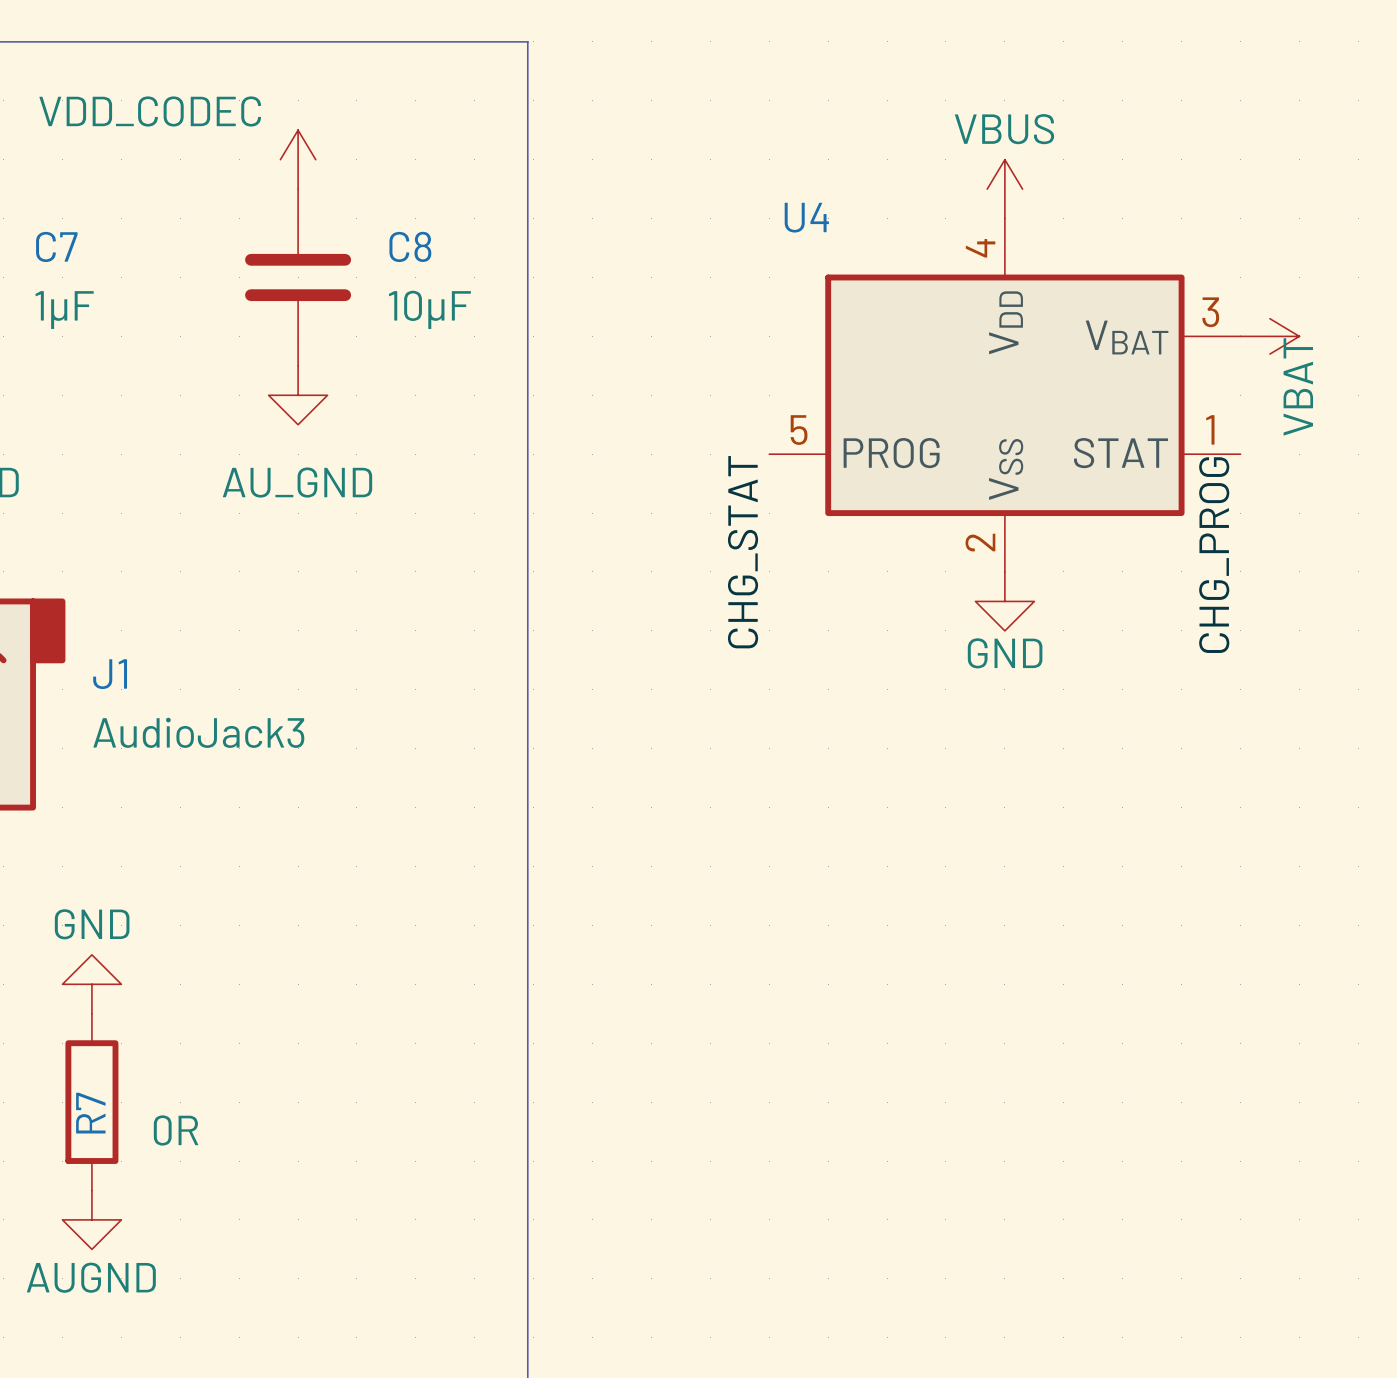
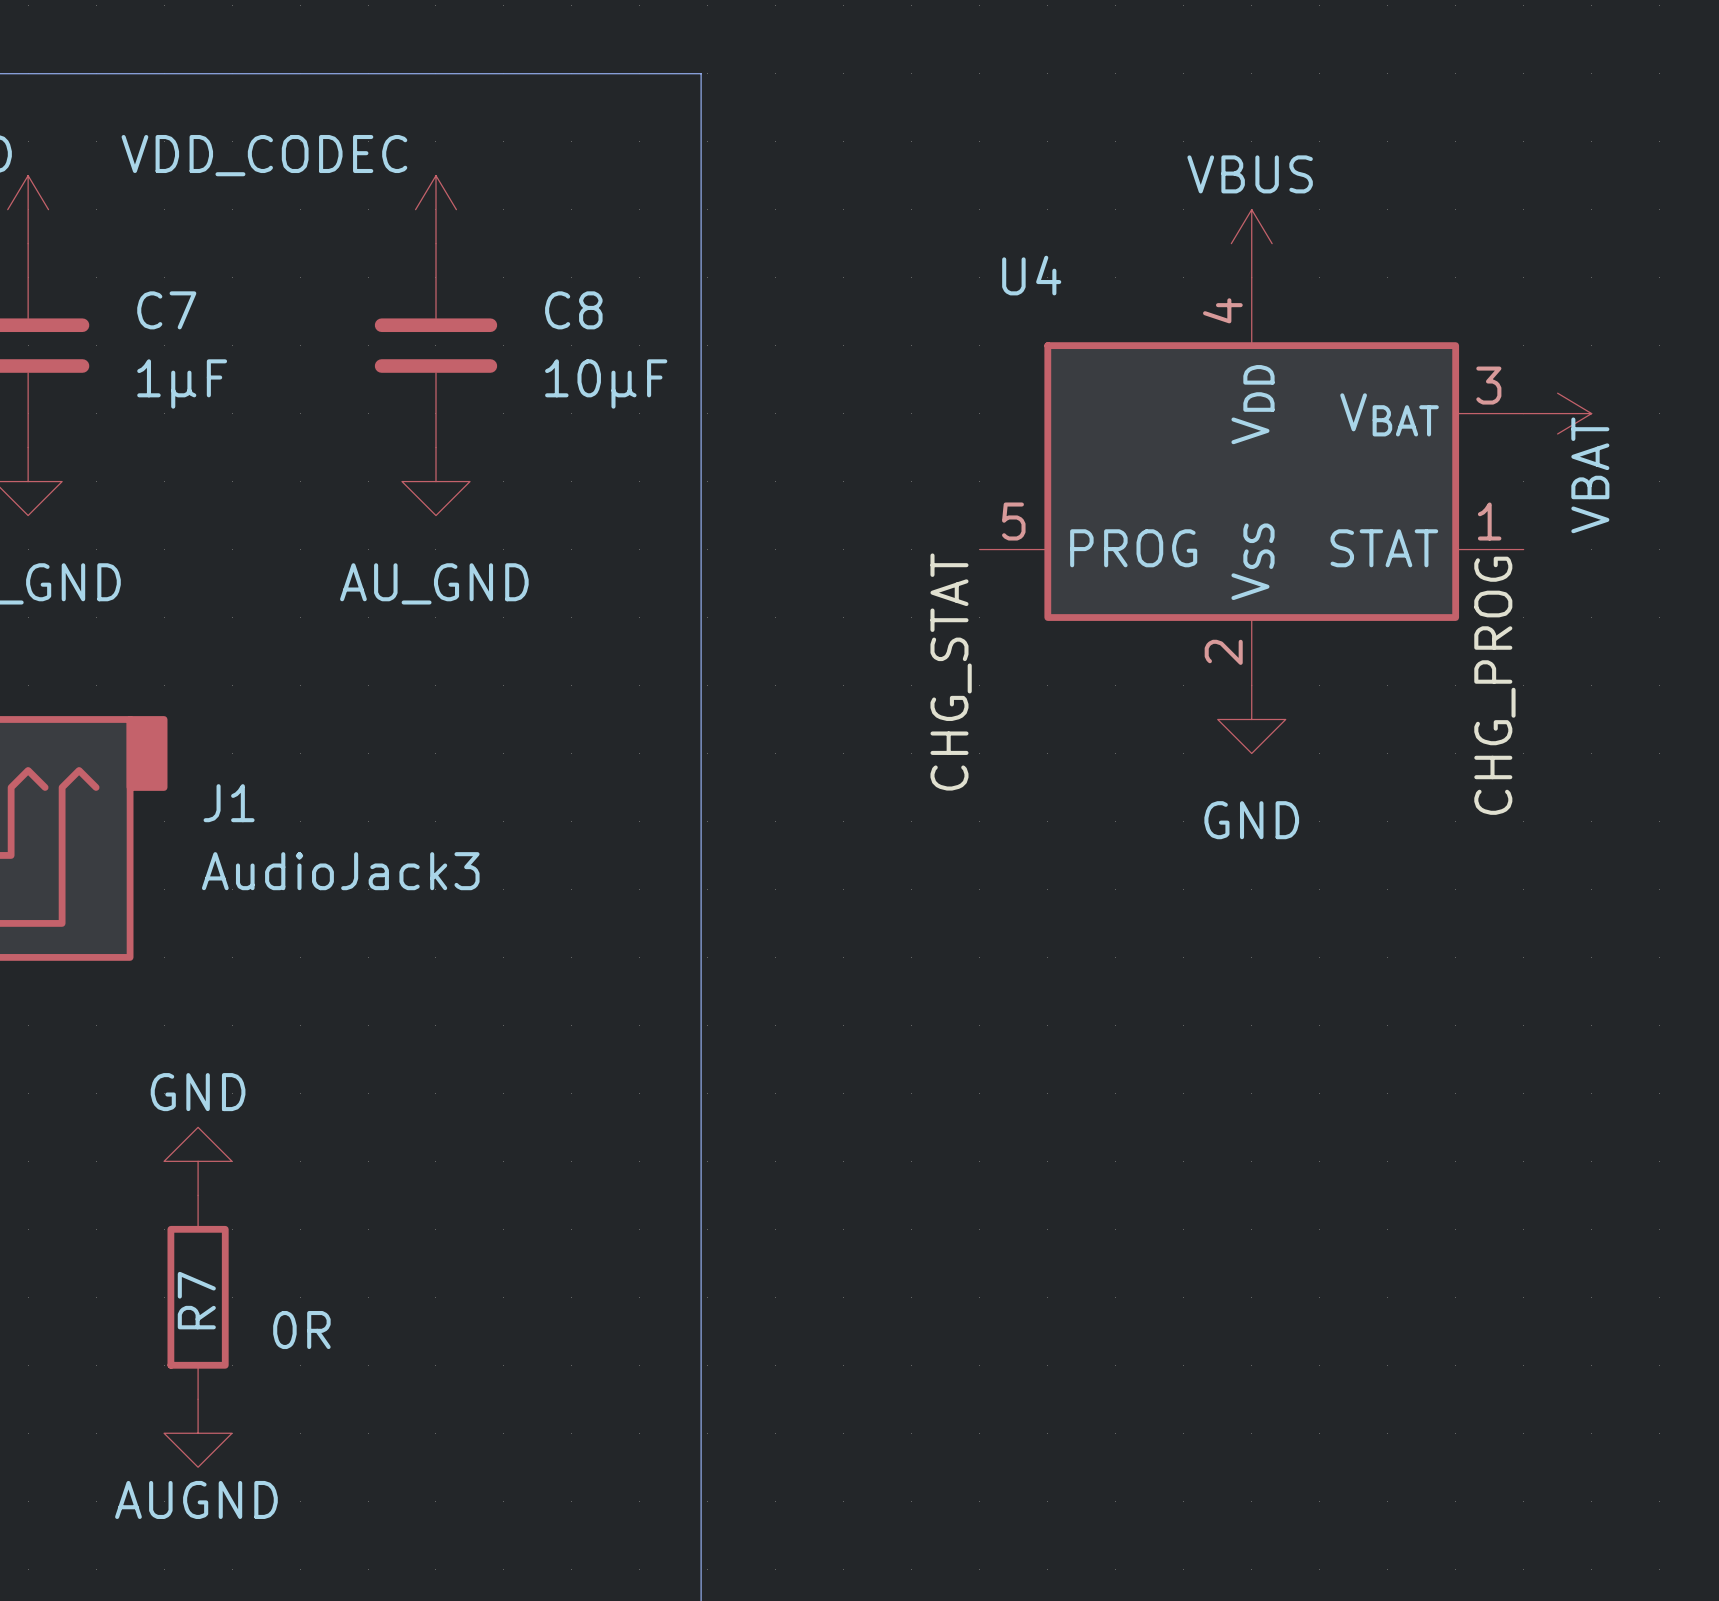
power symbol text position: GND (1005, 653) -> GND (1251, 820)

